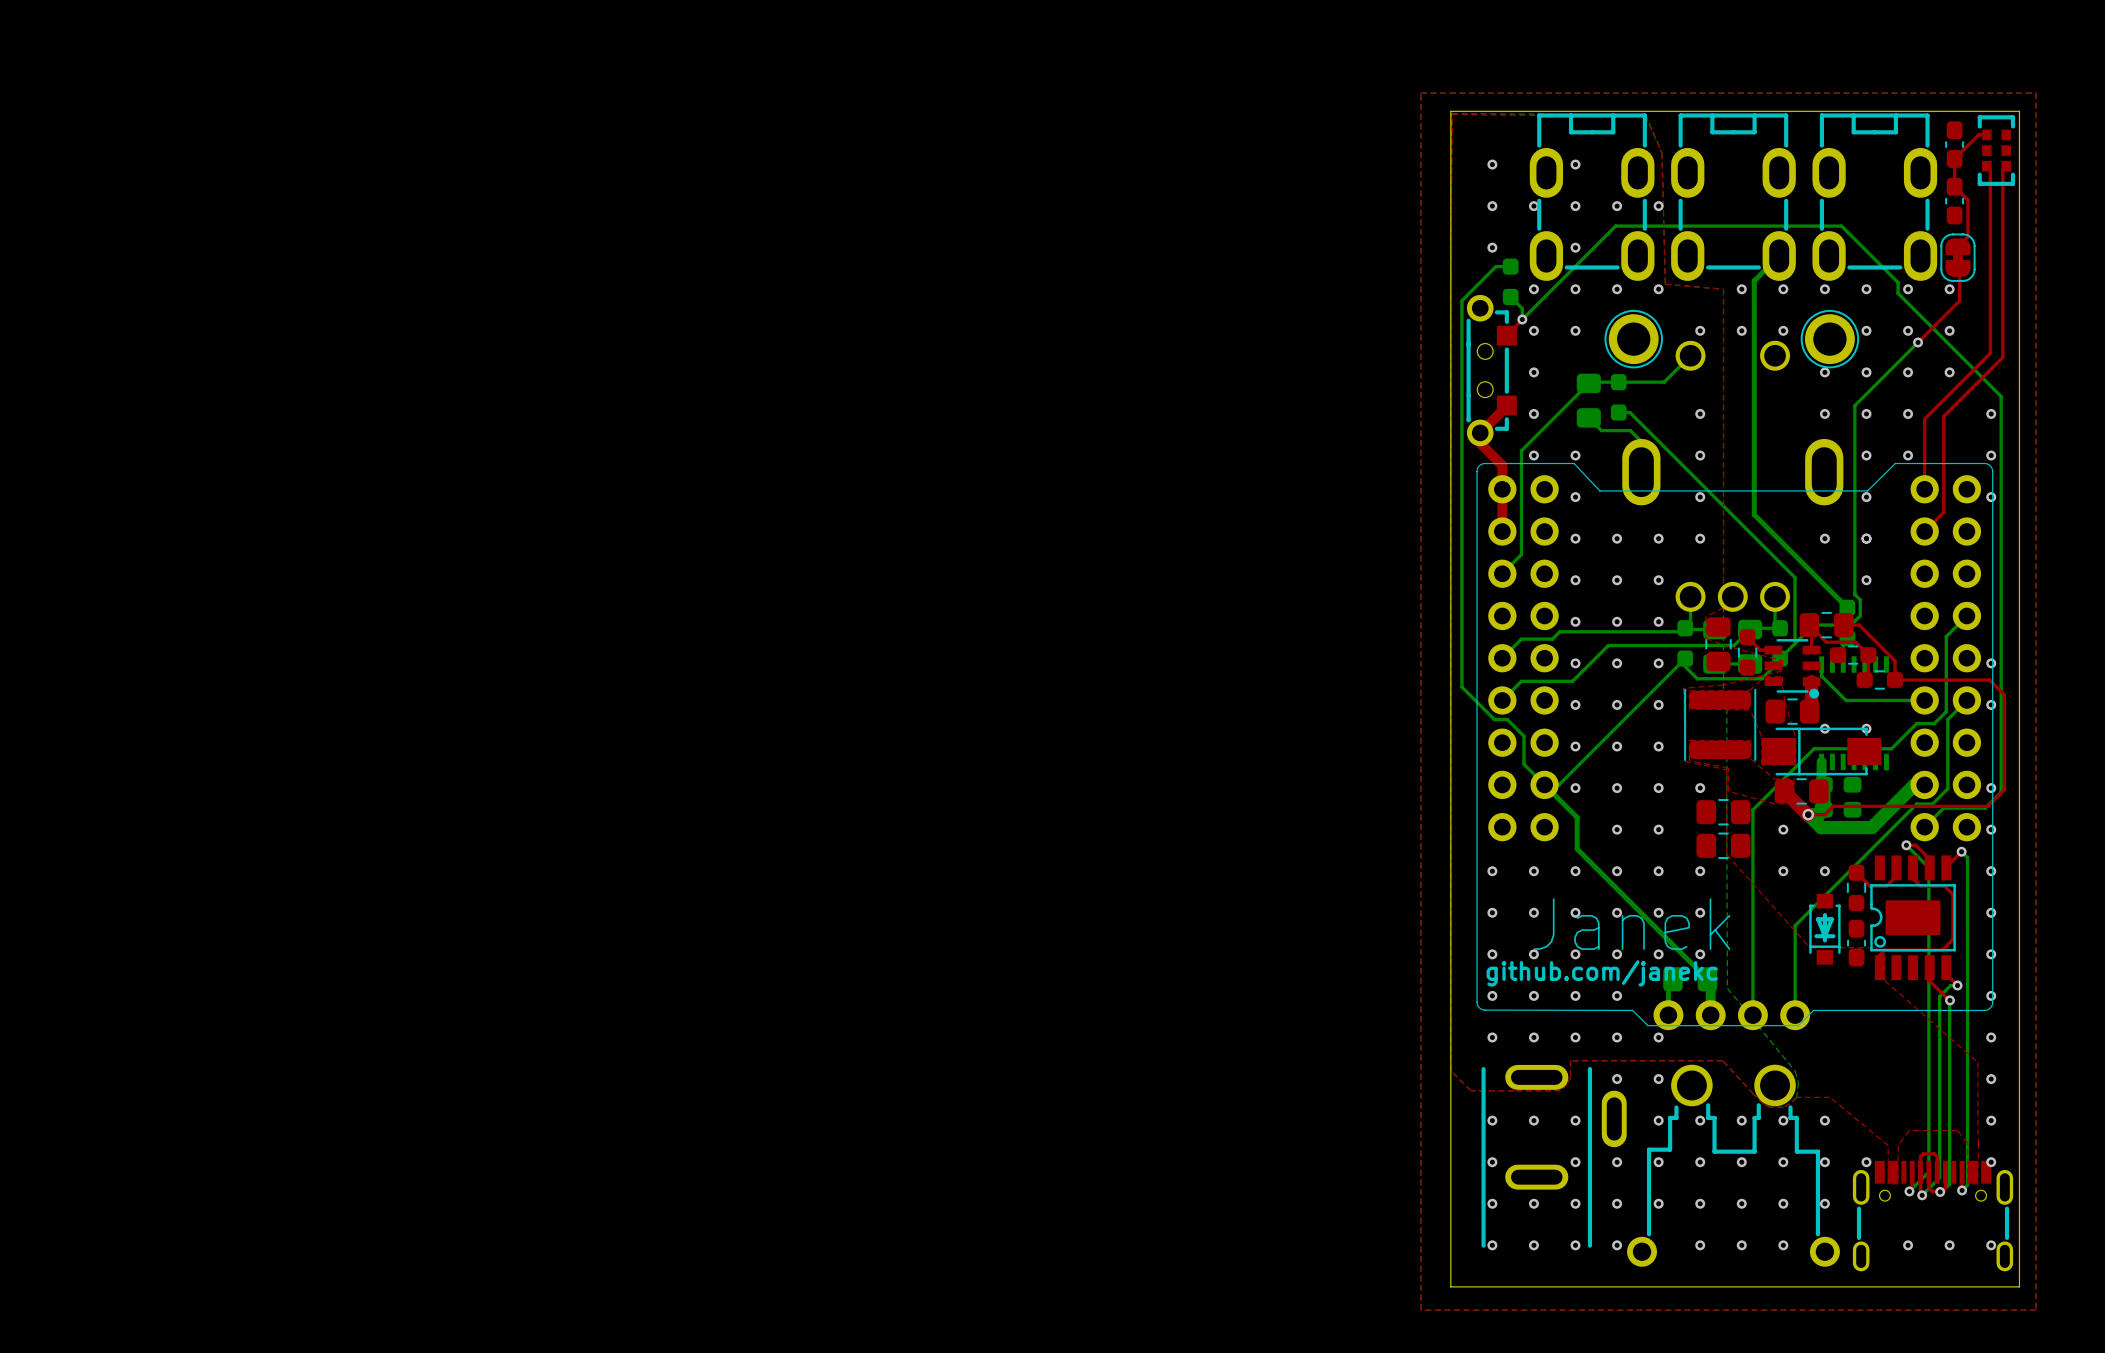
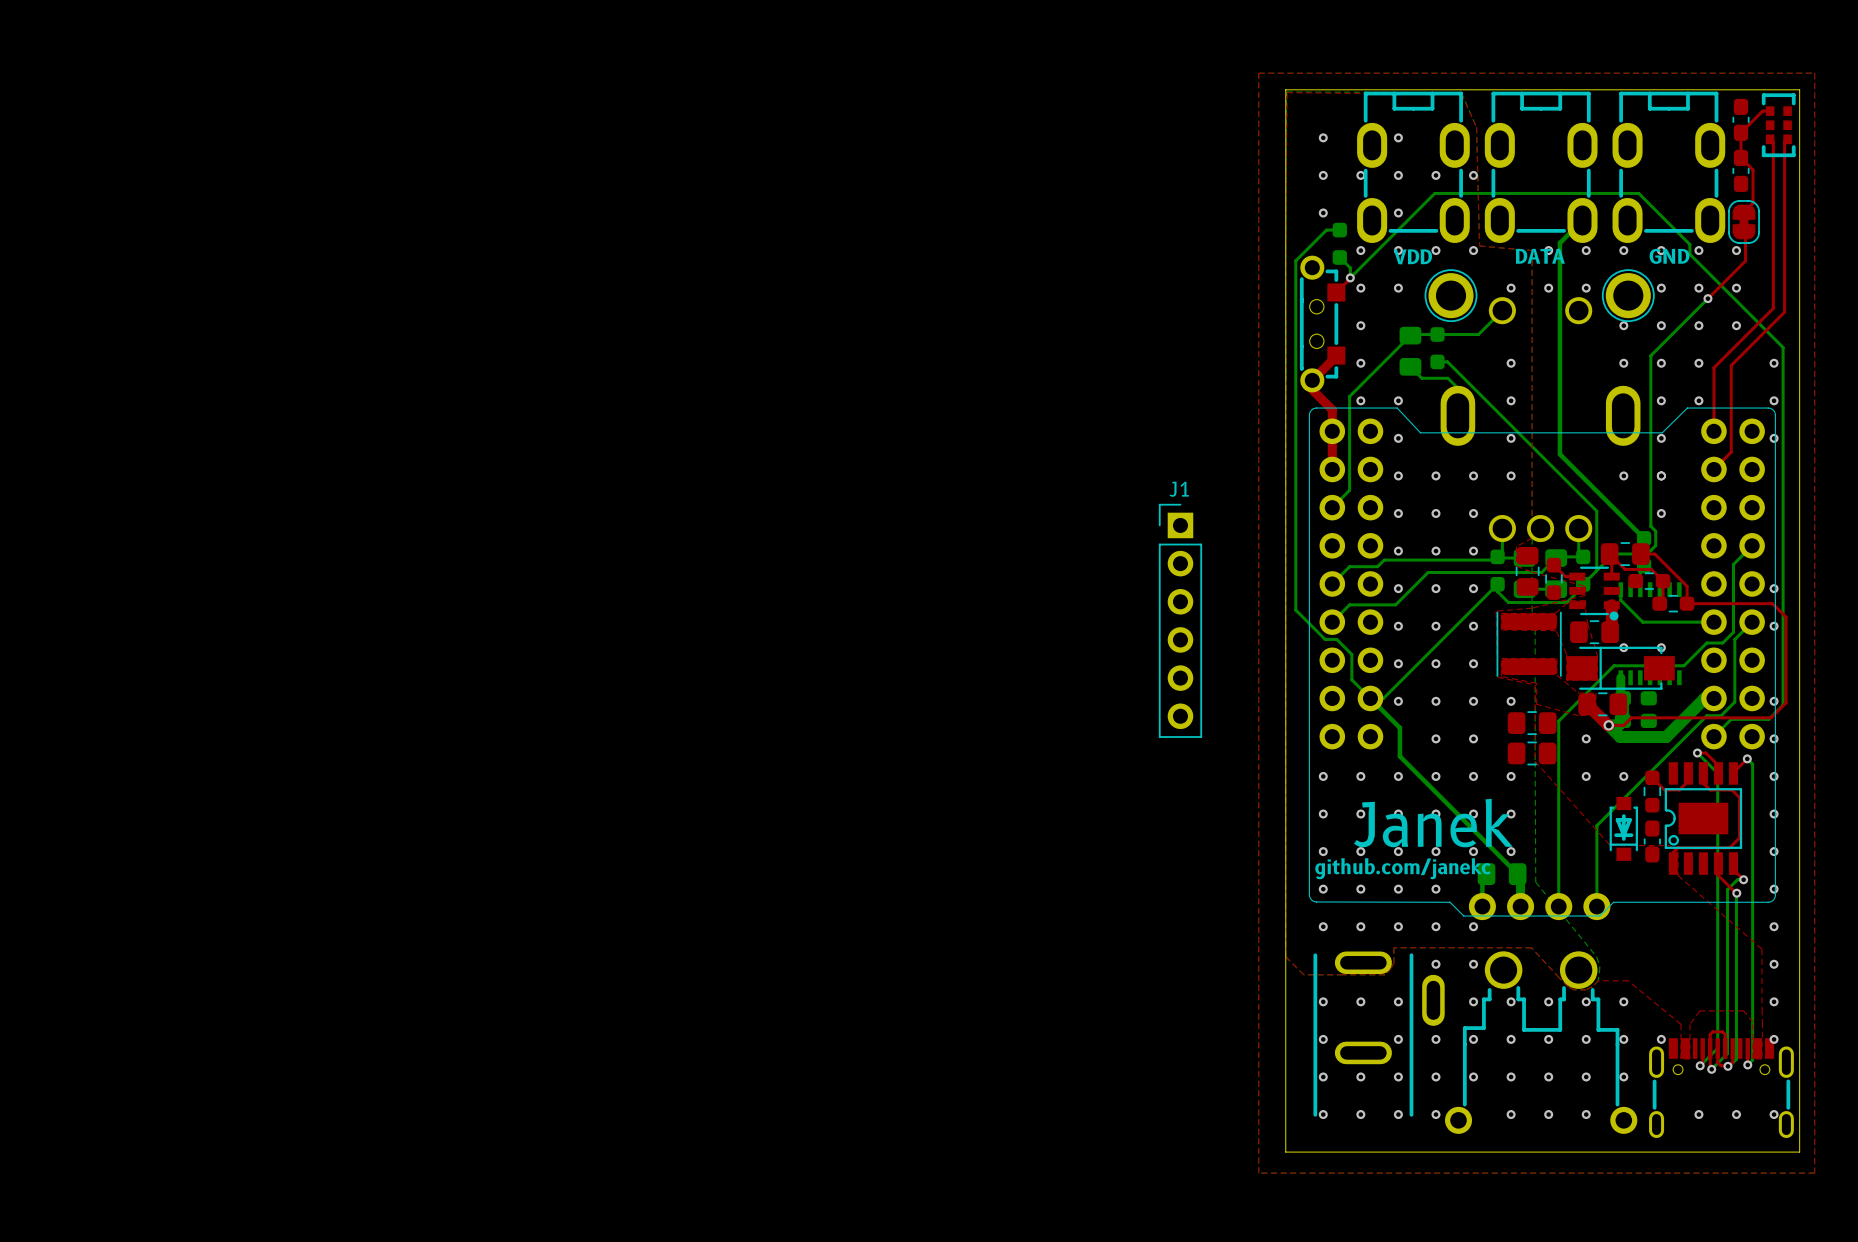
text: none -> DATA (1540, 256)
text: none -> GND (1669, 256)
text: none -> VDD (1412, 256)
J1: none -> (1180, 620)

